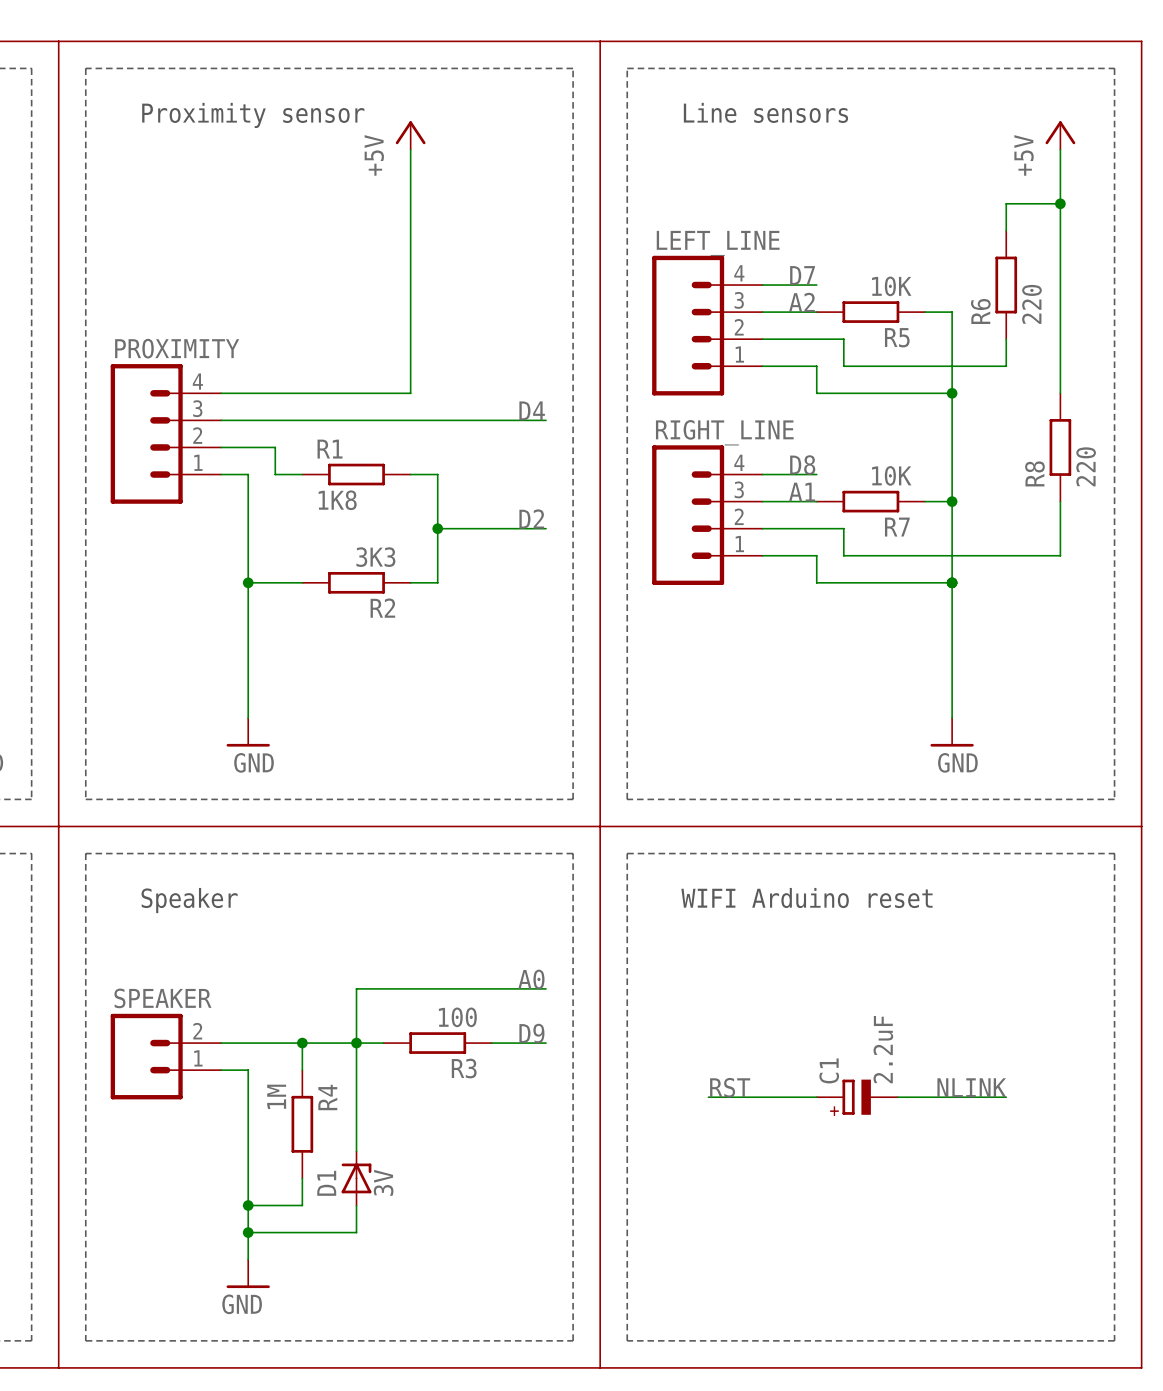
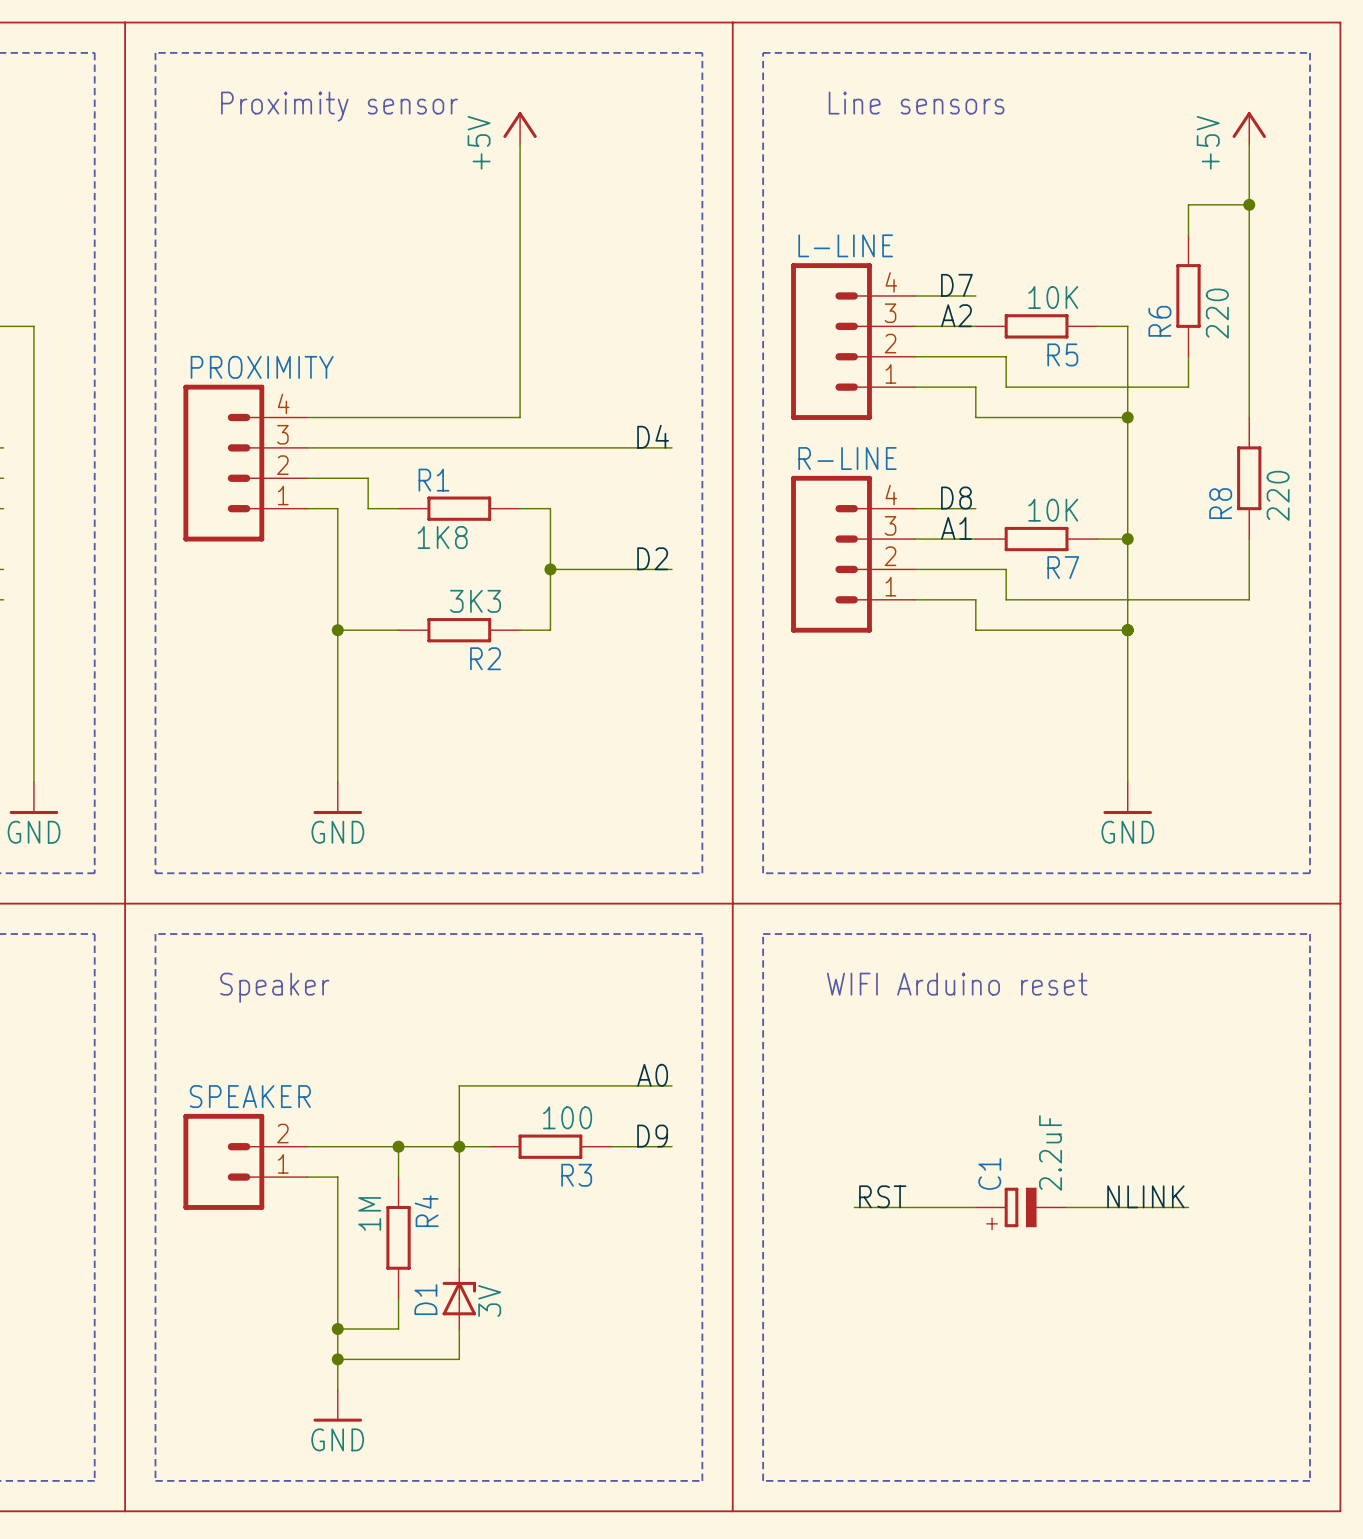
LEFT_LINE name: LEFT_LINE (718, 243) -> L-LINE (845, 245)
RIGHT_LINE name: RIGHT_LINE (724, 432) -> R-LINE (847, 458)

